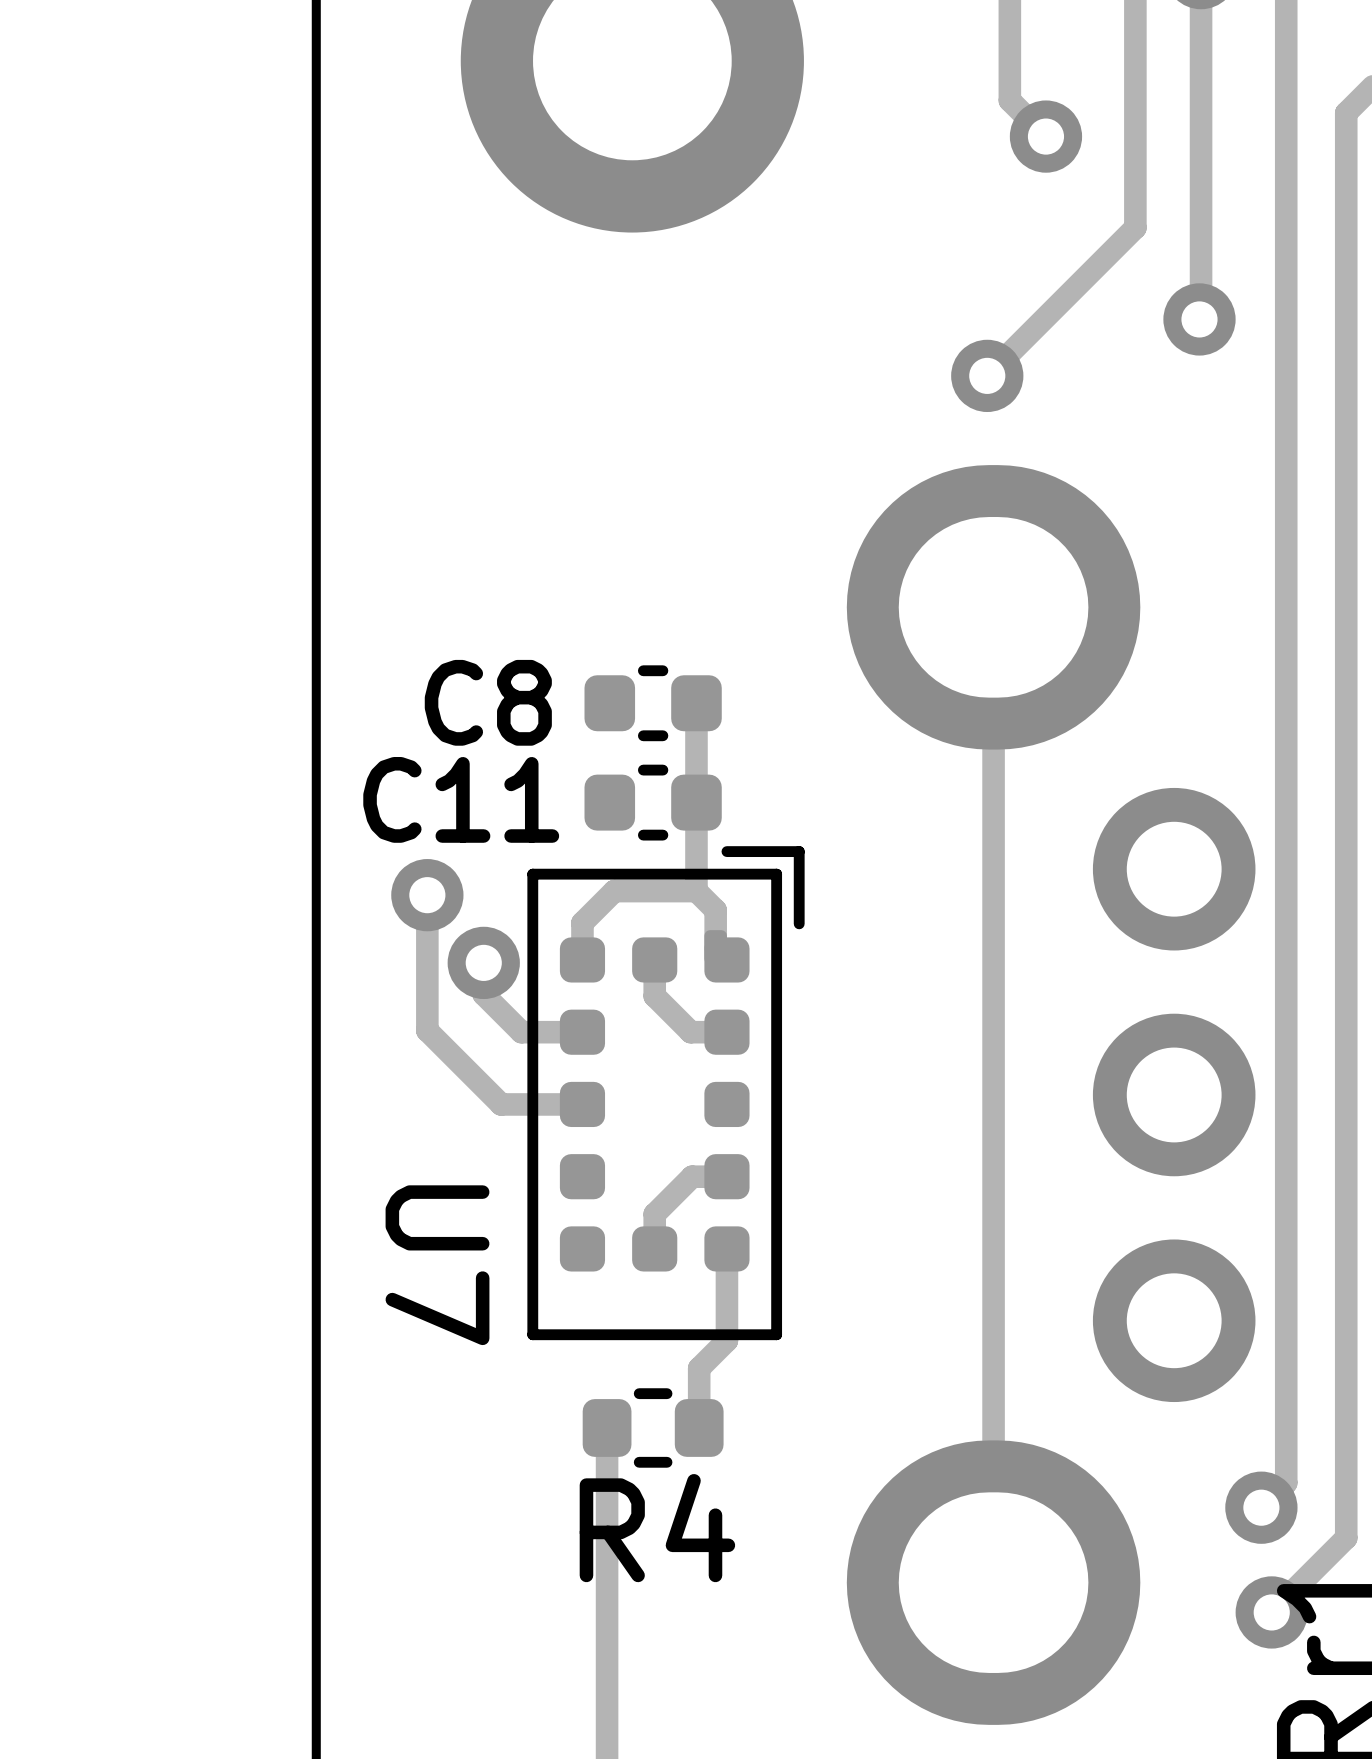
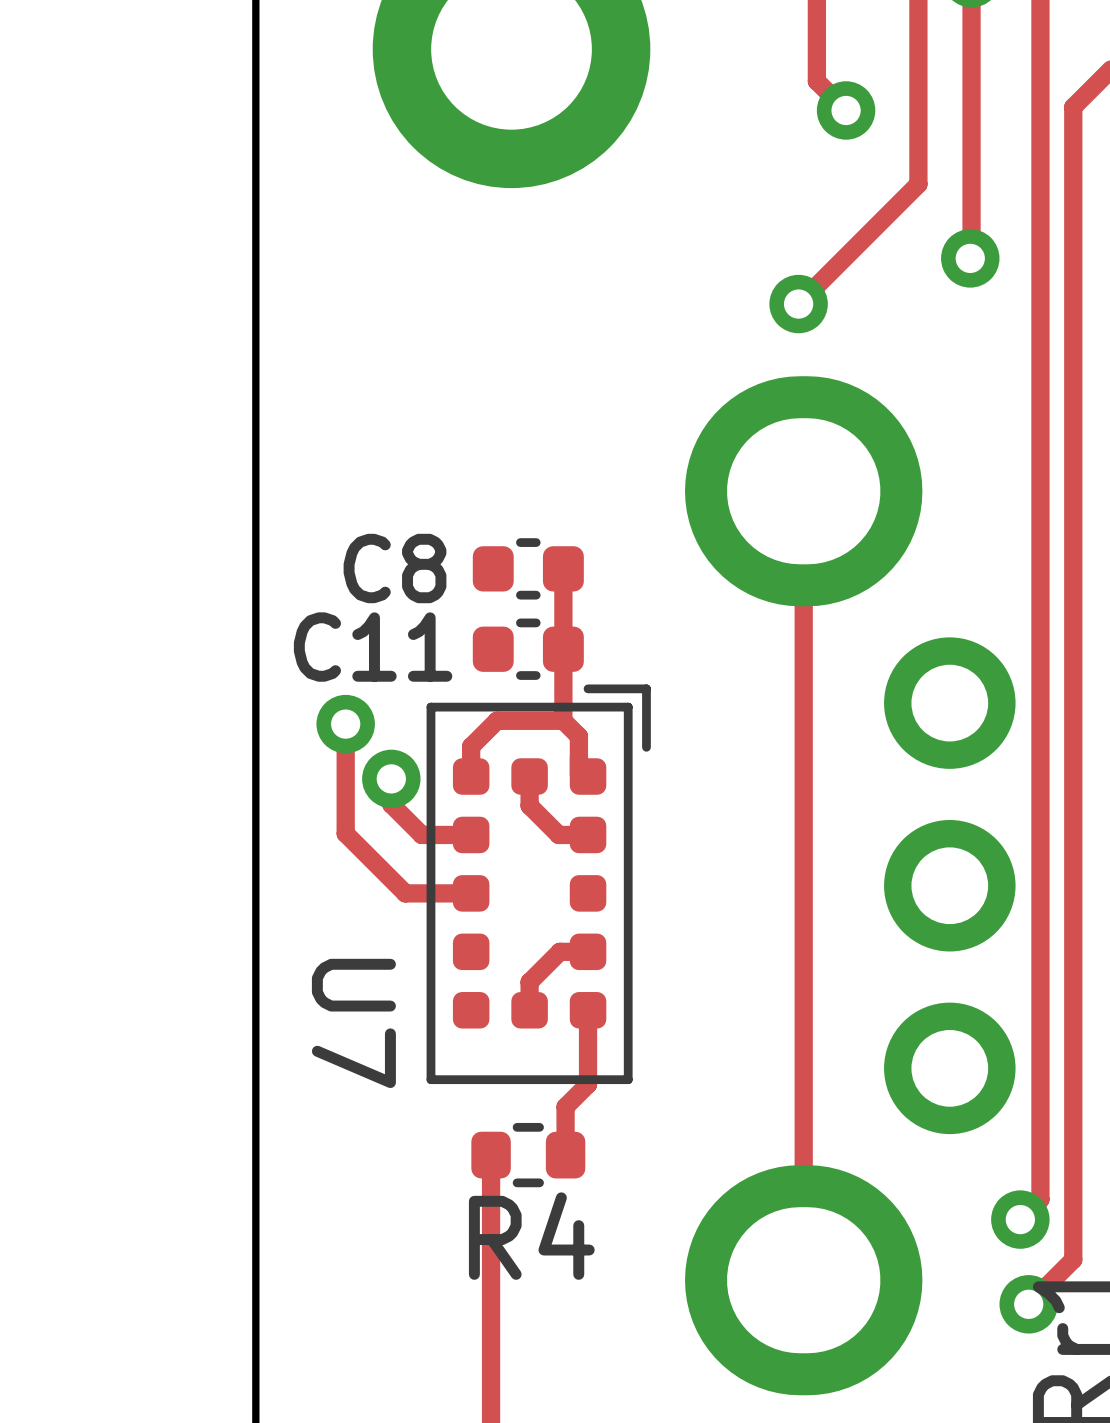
track: (1346, 113) (1346, 1537) (1326, 1557) -> (1088, 91) (1073, 107) (1073, 1259)

